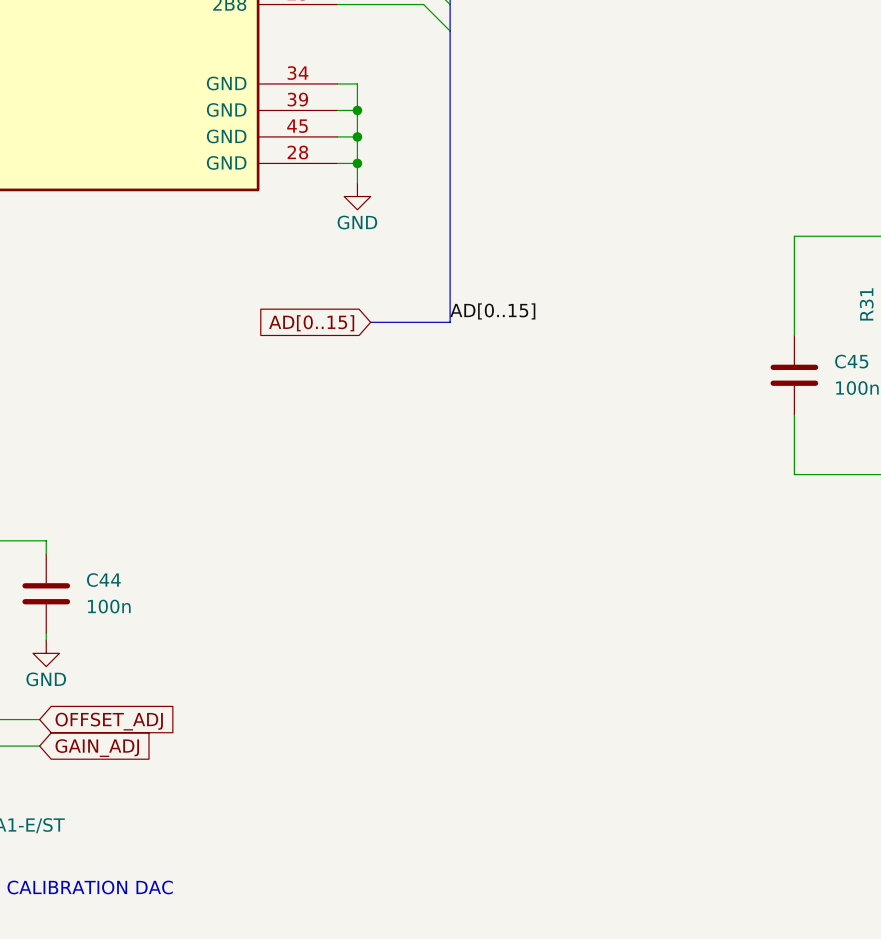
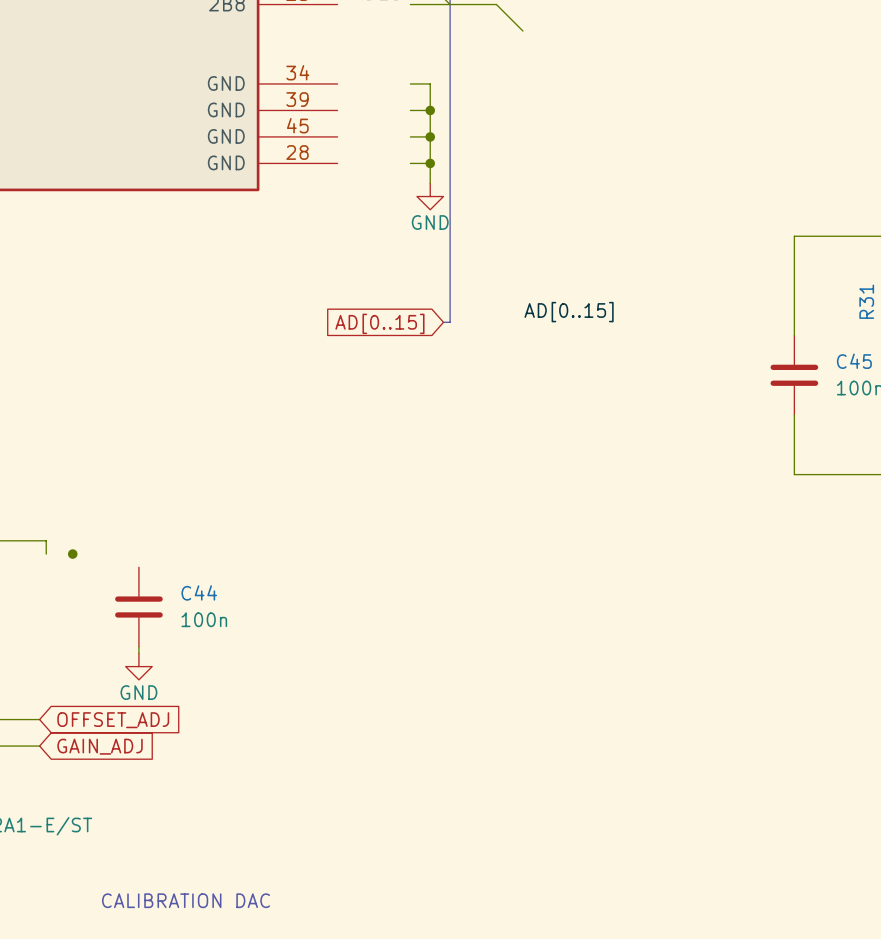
wire: (337, 4) (410, 4) -> none
wire: (423, 4) (450, 31) -> (423, 4) (496, 4) (522, 31)
wire: (337, 83) (357, 83) (357, 183) -> (410, 83) (430, 83) (430, 183)
wire: (337, 110) (357, 110) -> (410, 110) (430, 110)
junction: (357, 110) -> none
junction: none -> (430, 110)
wire: (337, 136) (357, 136) -> (410, 136) (430, 136)
junction: (357, 136) -> none
junction: none -> (430, 136)
wire: (337, 163) (357, 163) -> (410, 163) (430, 163)
junction: (357, 163) -> none
junction: none -> (430, 163)
power symbol position: GND (357, 196) -> GND (430, 196)
label position: AD[0..15] (492, 311) -> AD[0..15] (569, 312)
bus: (370, 322) (443, 322) -> none
global label position: AD[0..15] (311, 323) -> AD[0..15] (379, 323)
junction: none -> (72, 554)
C44 position: (46, 593) -> (138, 607)
wire: (46, 633) (46, 640) -> (138, 646) (138, 653)
power symbol position: GND (46, 653) -> GND (138, 666)
text position: CALIBRATION DAC (90, 887) -> CALIBRATION DAC (186, 900)

